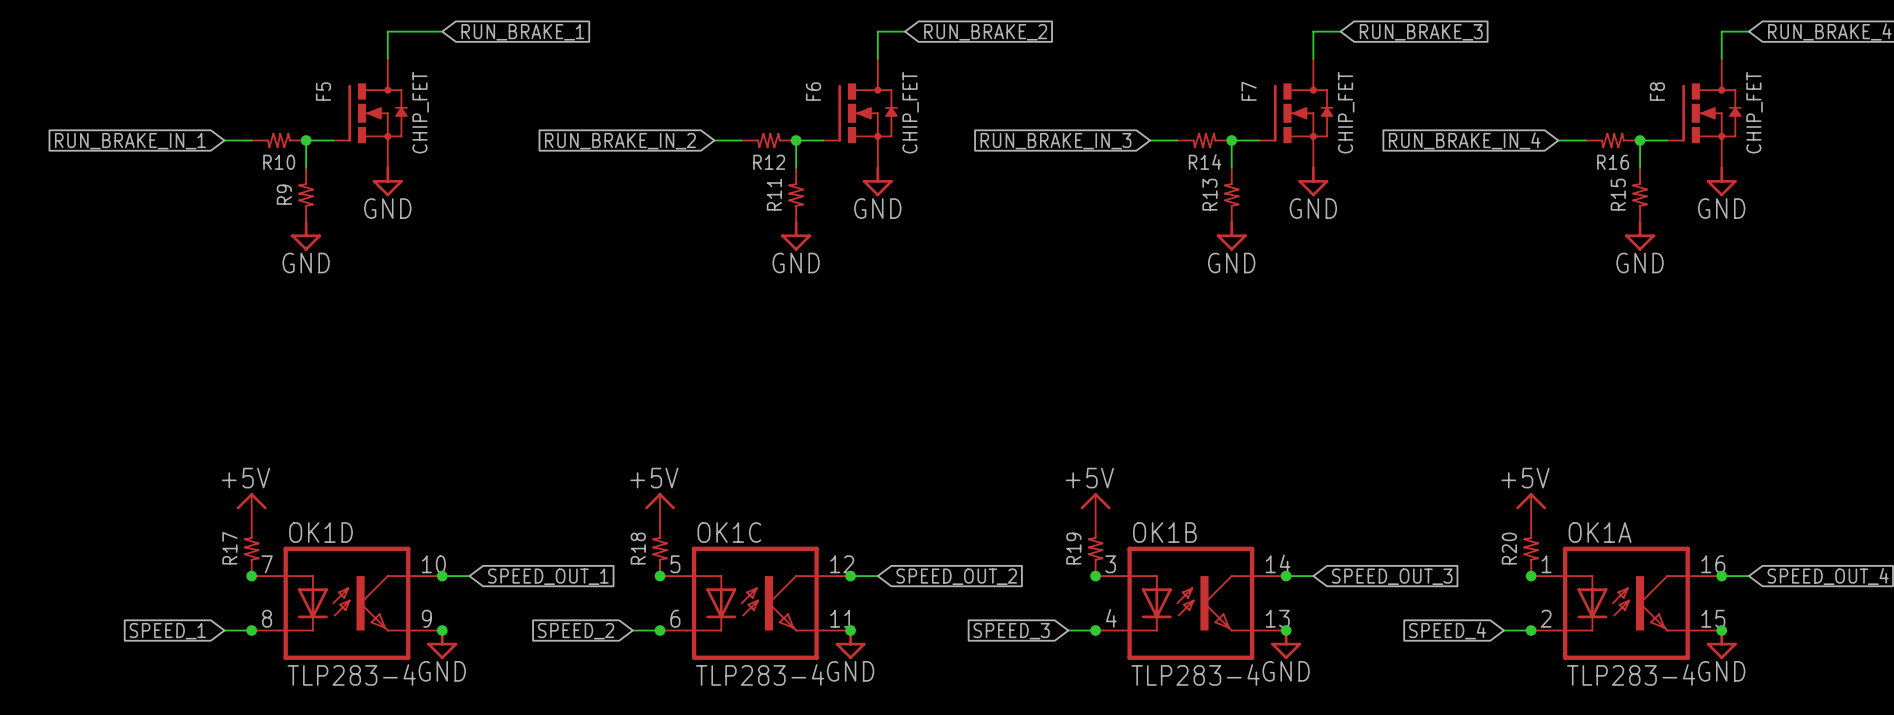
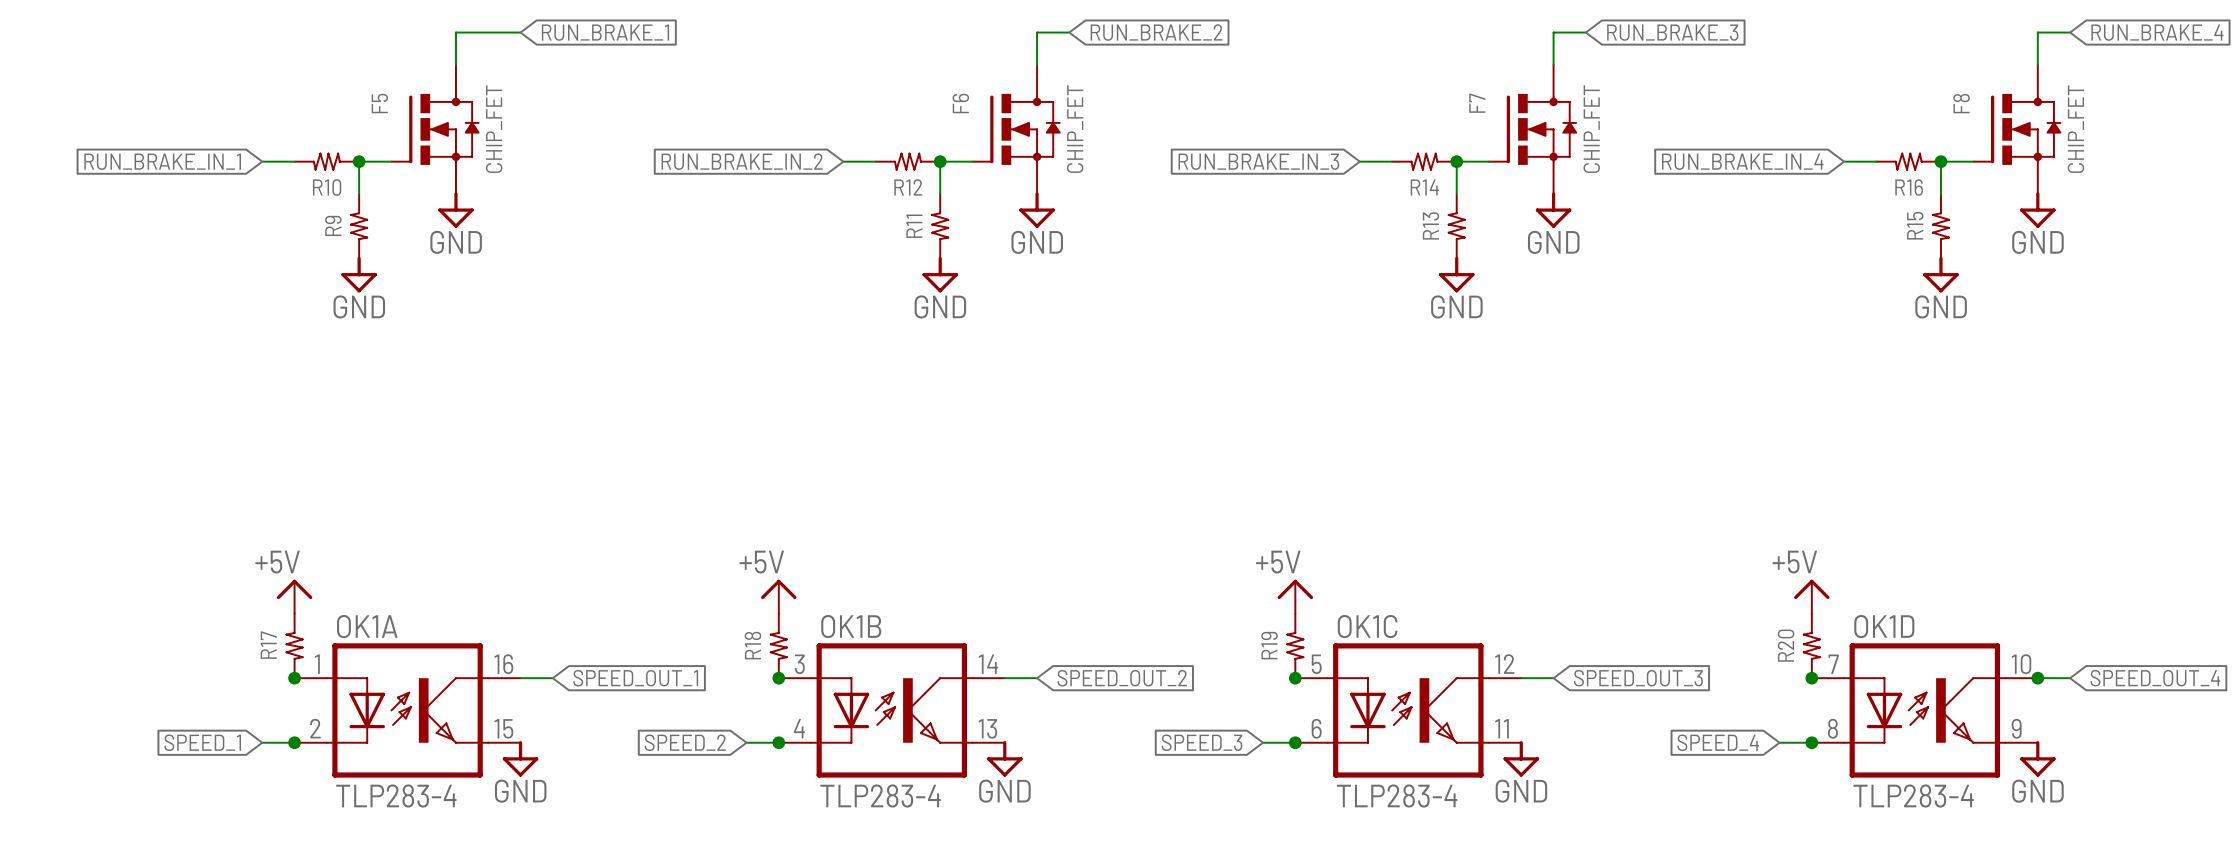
junction: (442, 576) -> none
junction: (850, 576) -> none
junction: (1286, 576) -> none
OK1D position: (346, 603) -> (1924, 710)
OK1C position: (755, 603) -> (1408, 710)
OK1B position: (1190, 603) -> (891, 710)
OK1A position: (1626, 603) -> (407, 710)
junction: (442, 630) -> none
junction: (850, 630) -> none
junction: (1286, 630) -> none
junction: (1721, 630) -> none

